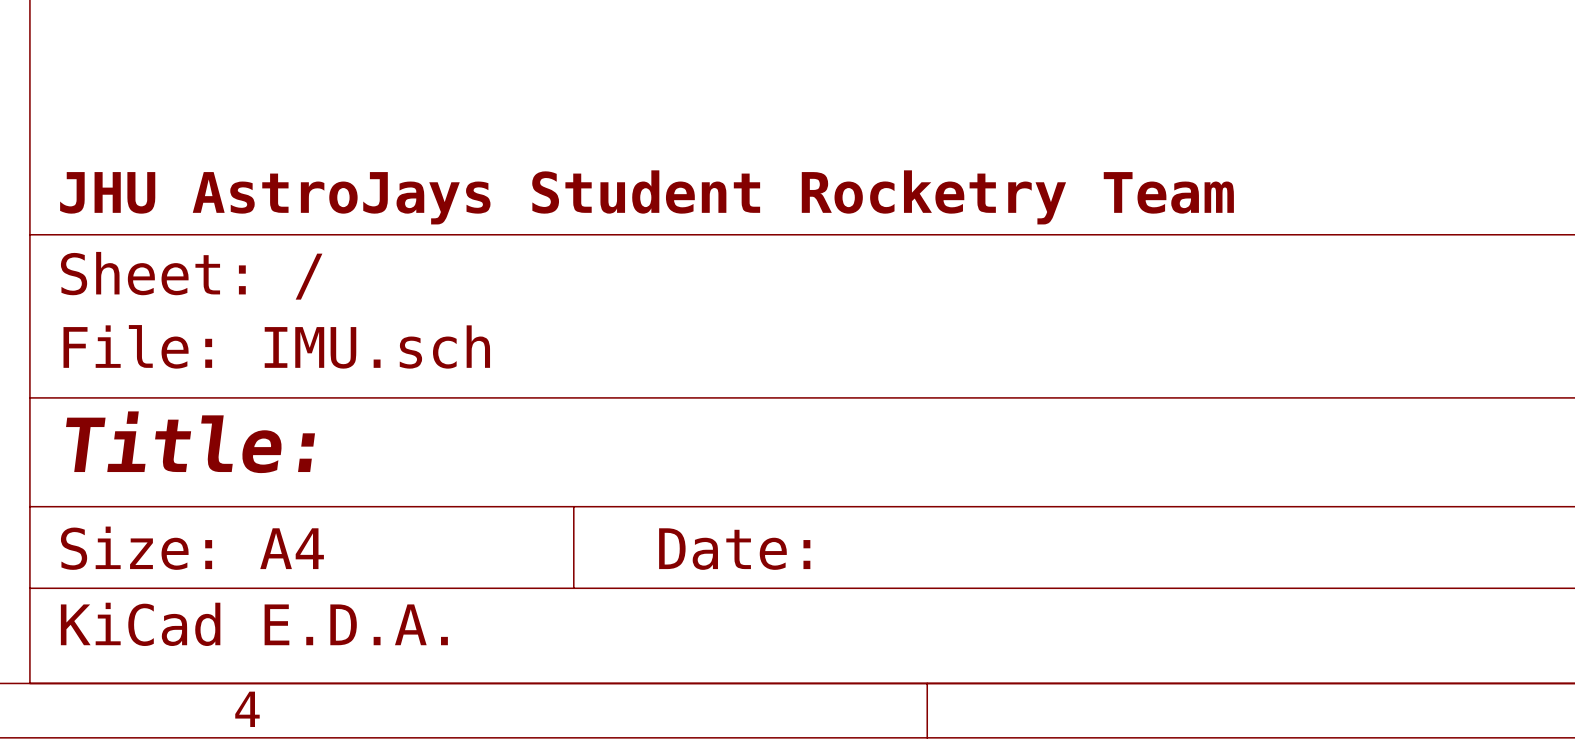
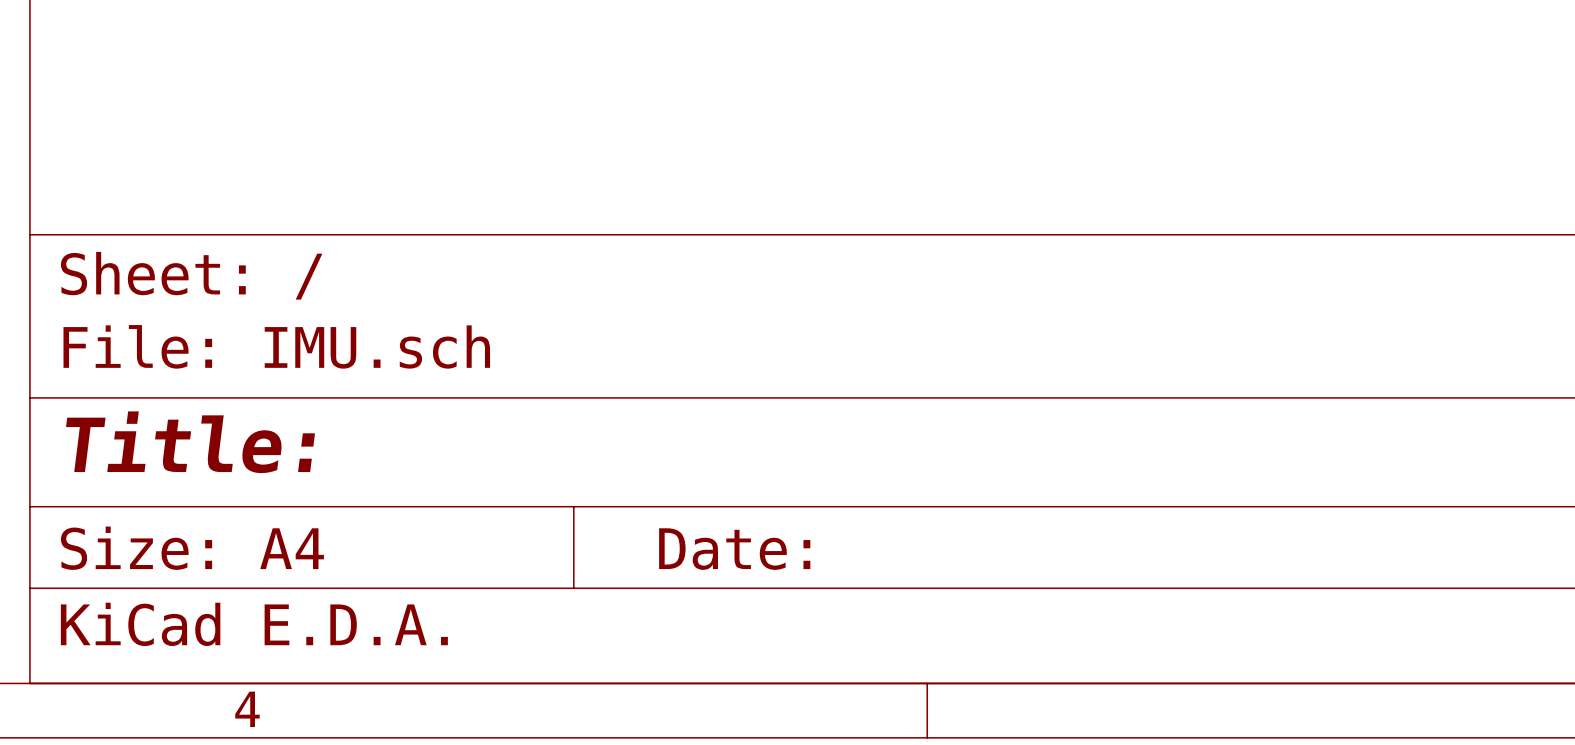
title block: JHU AstroJays Student Rocketry Team (647, 197) -> none

